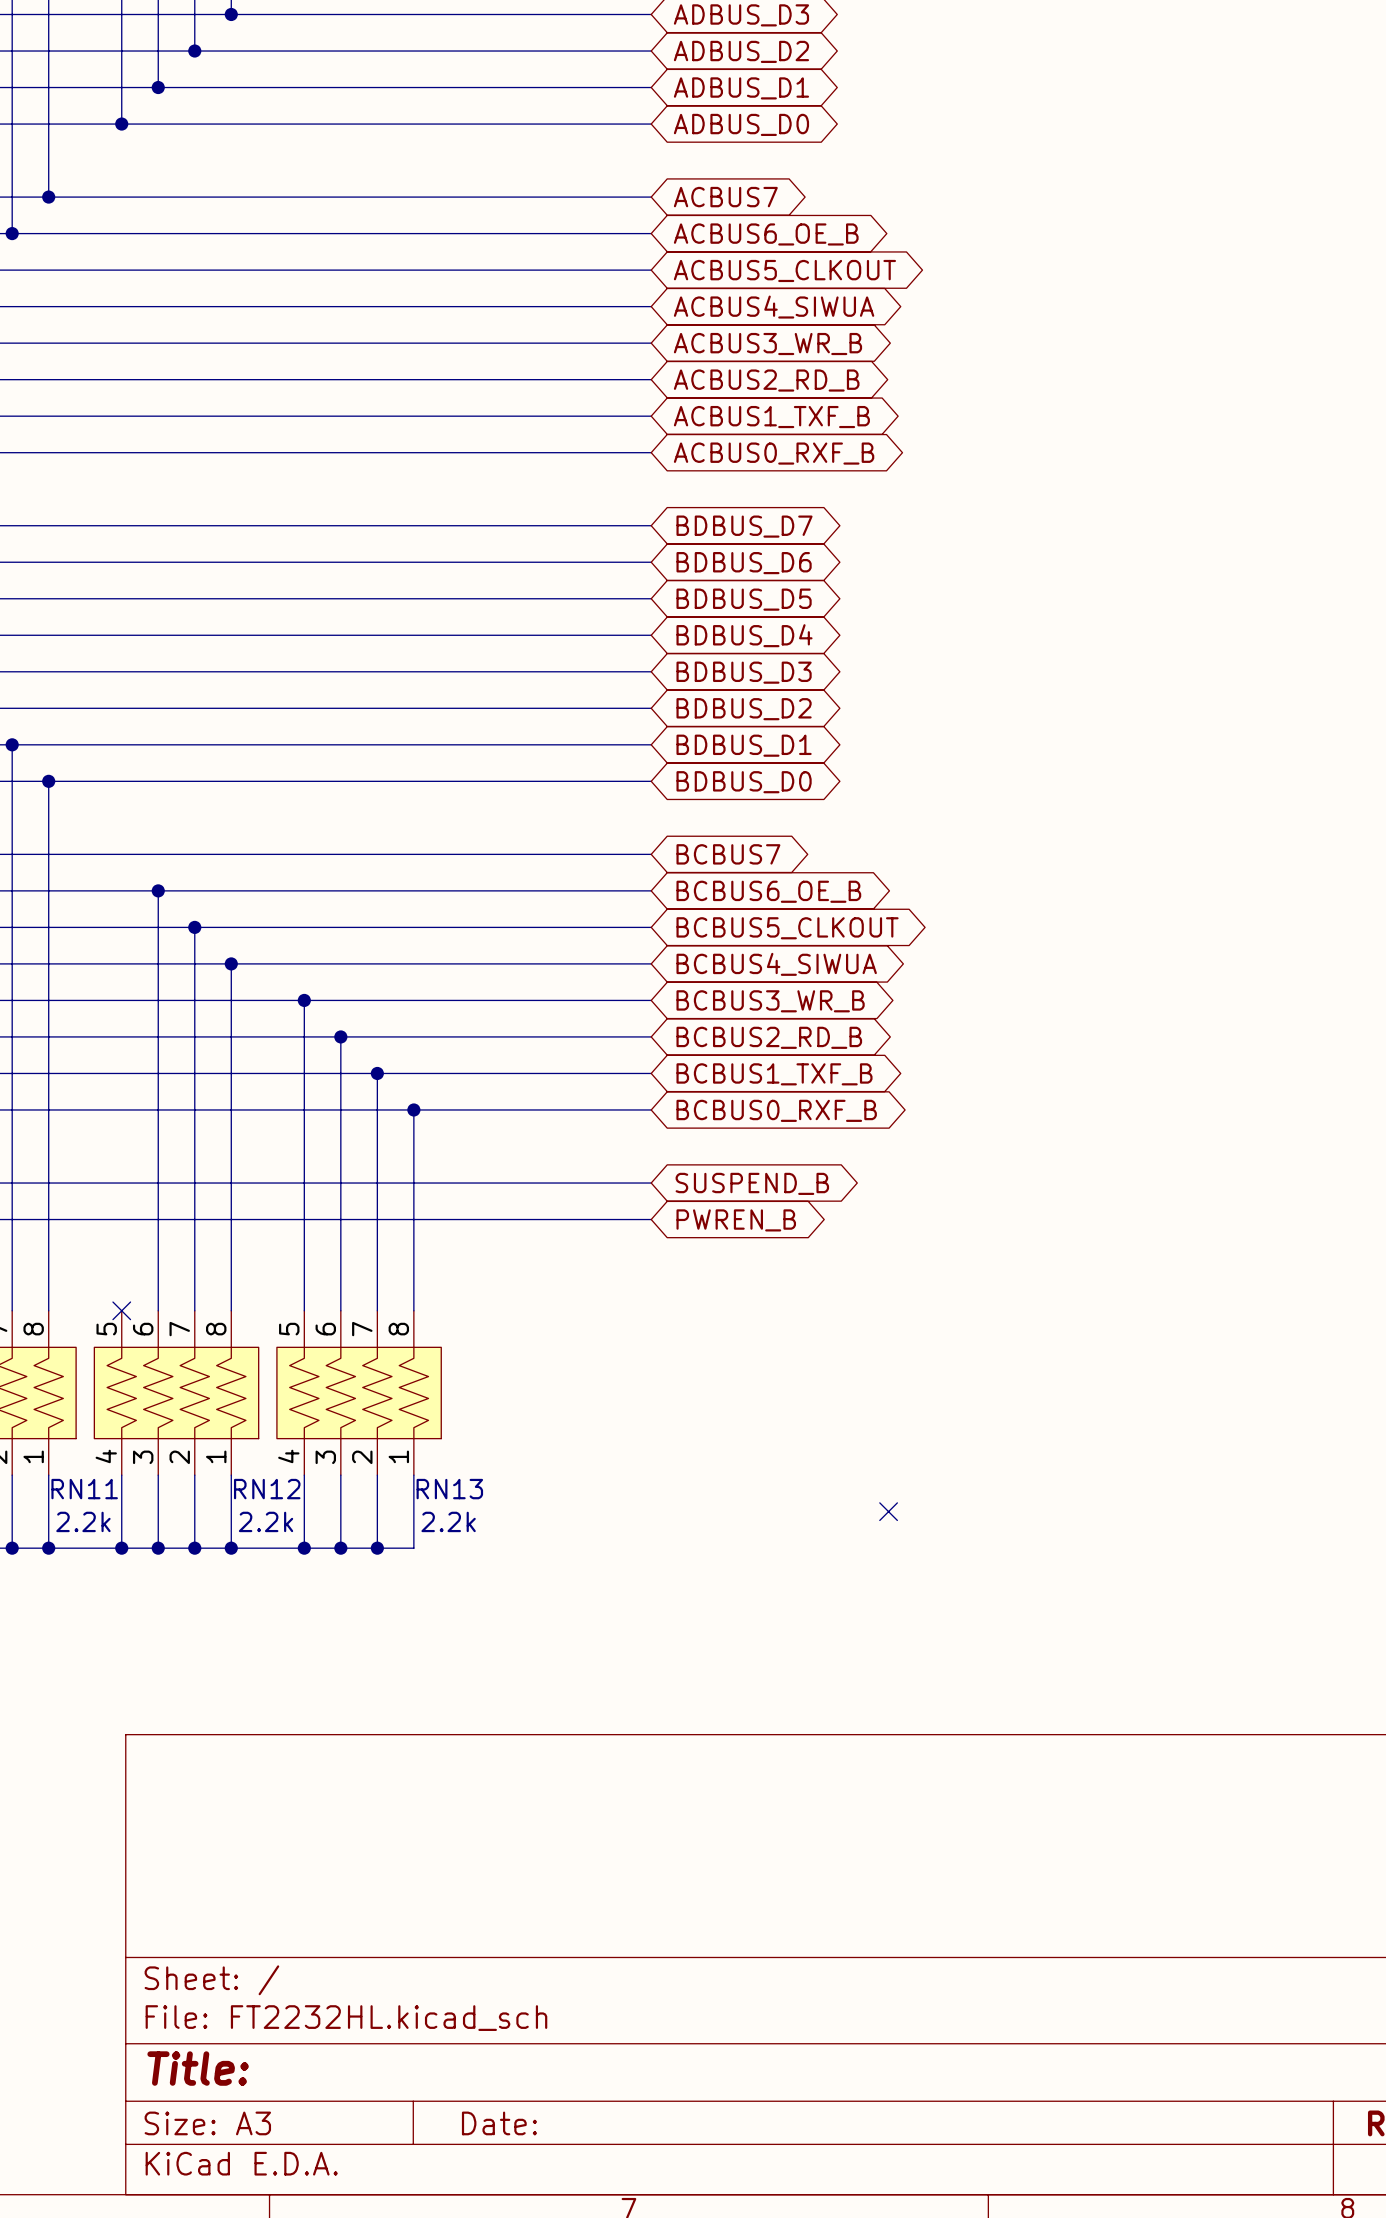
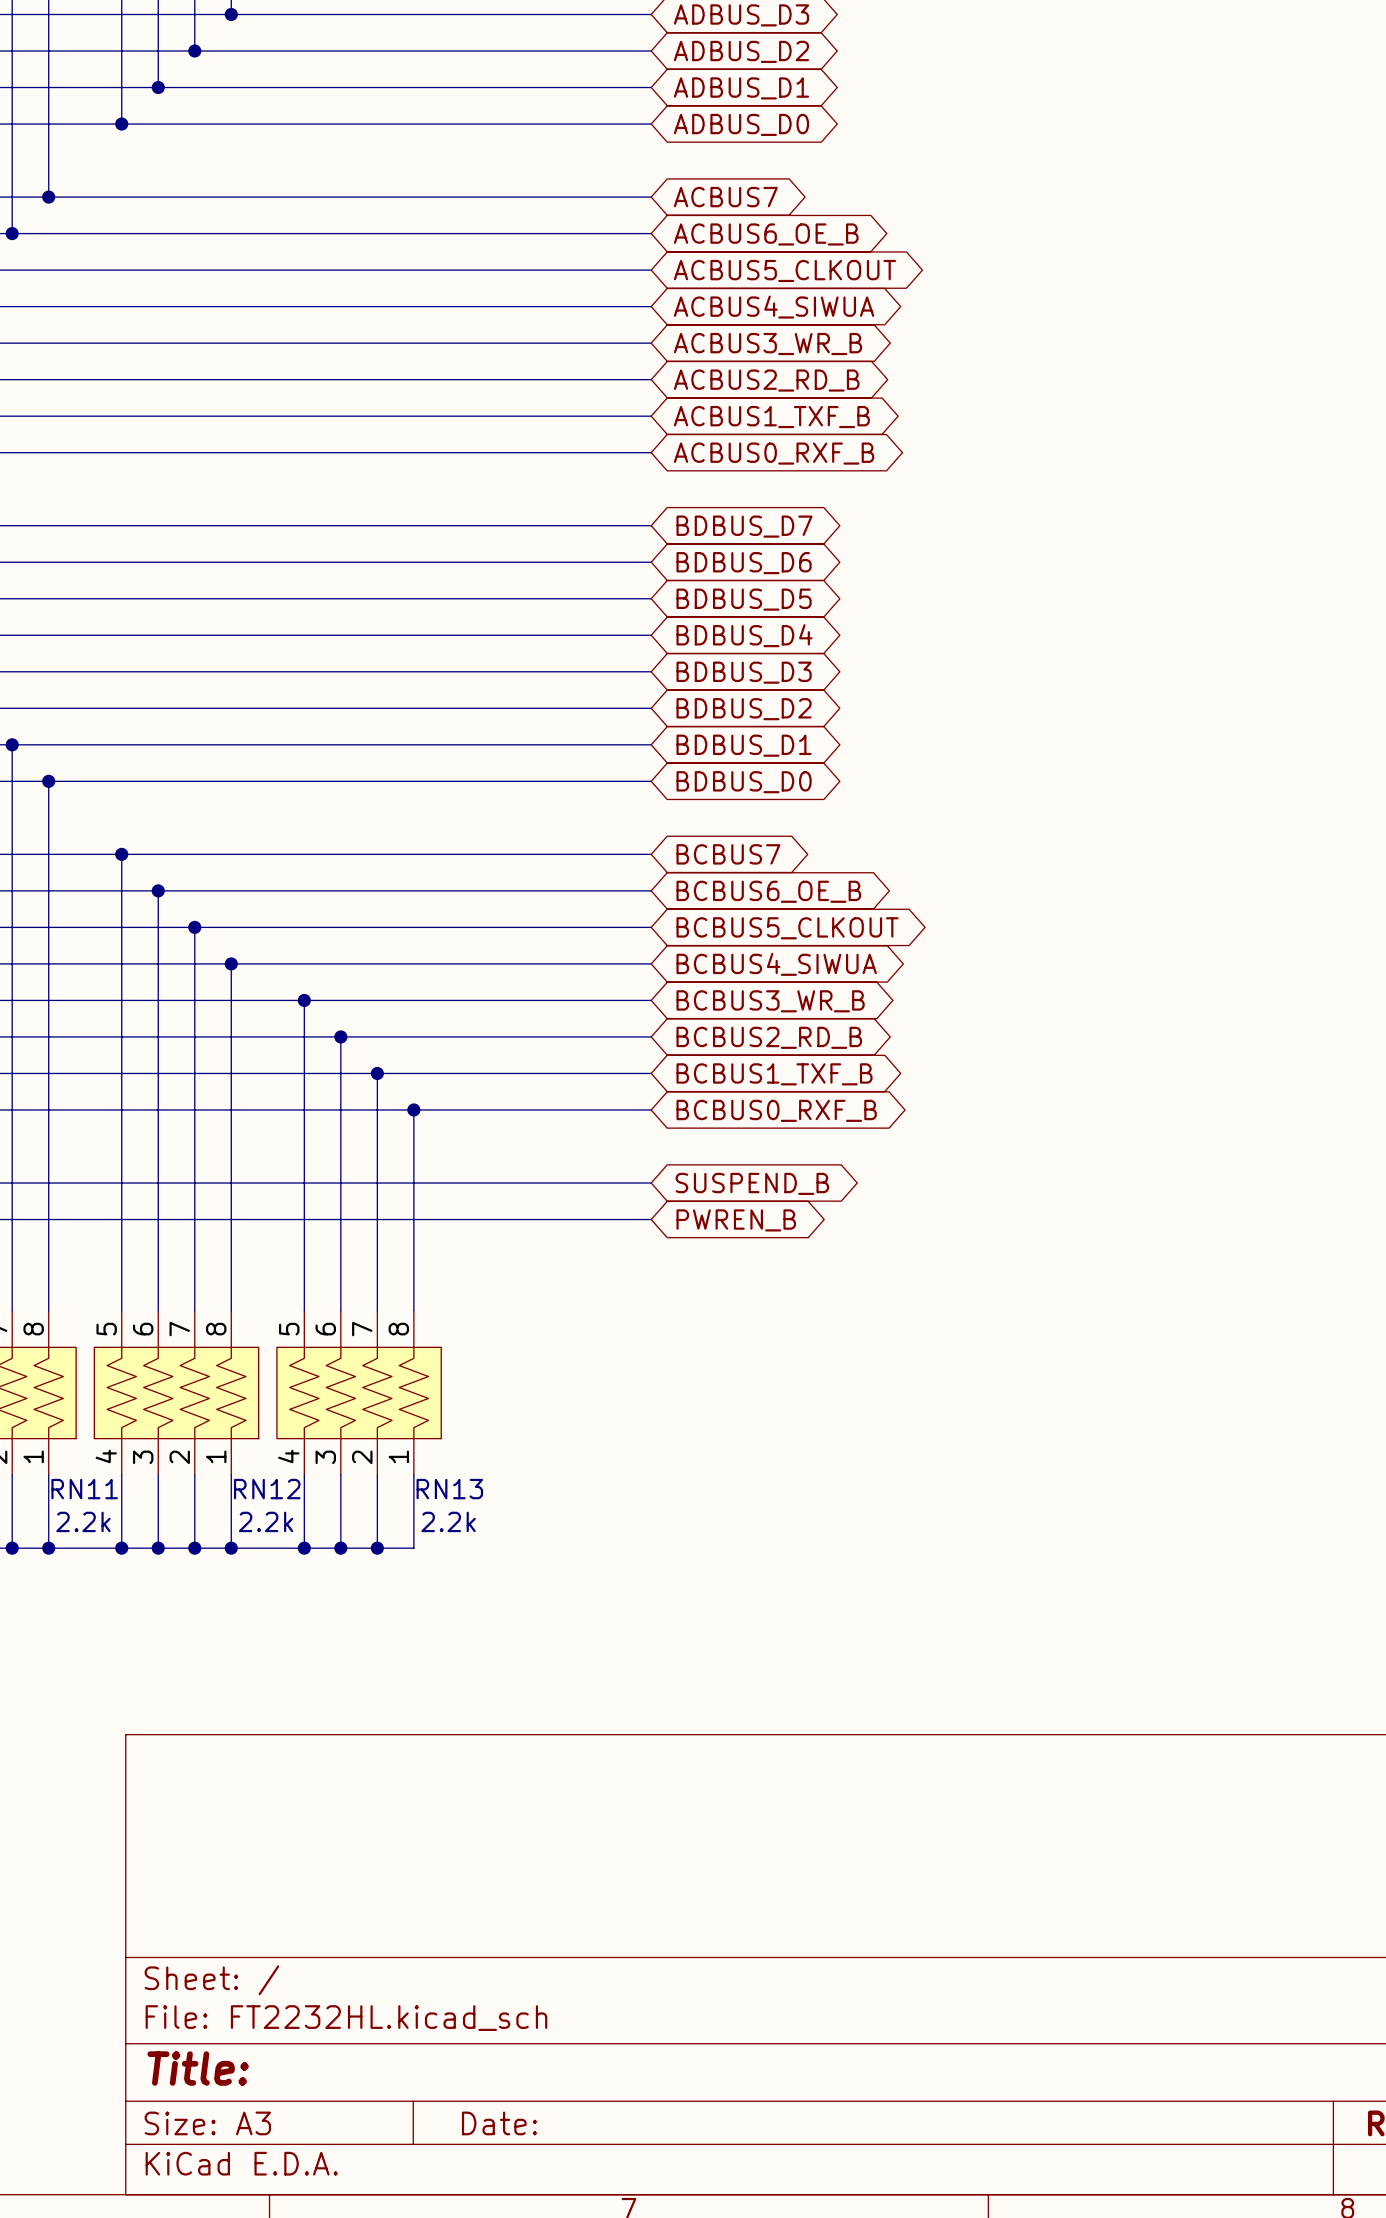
wire: none -> (121, 854) (121, 1310)
junction: none -> (121, 854)
no-connect mark: (121, 1310) -> none
no-connect mark: (888, 1511) -> none

